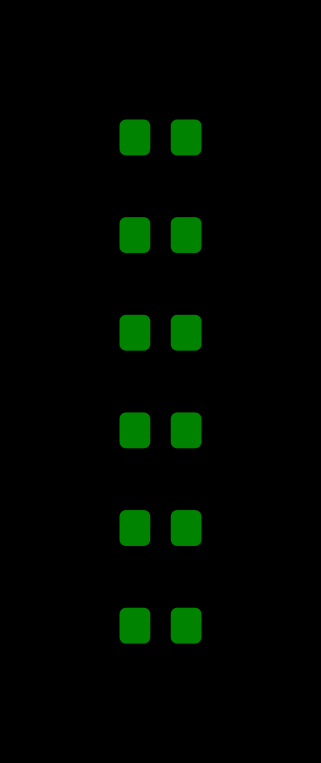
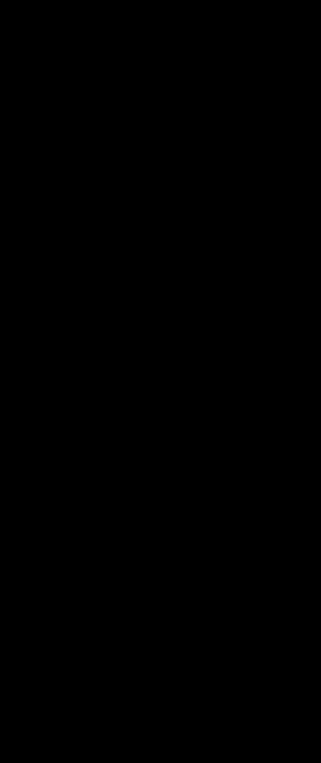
part: (160, 137) -> none
part: (160, 235) -> none
part: (160, 332) -> none
part: (160, 430) -> none
part: (160, 528) -> none
part: (160, 625) -> none

